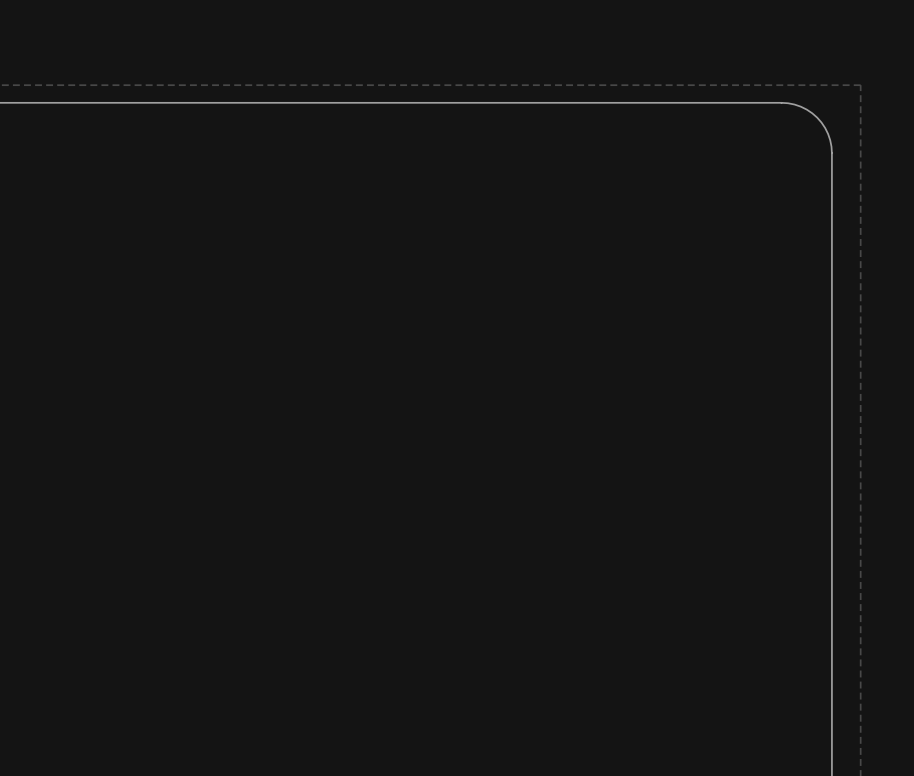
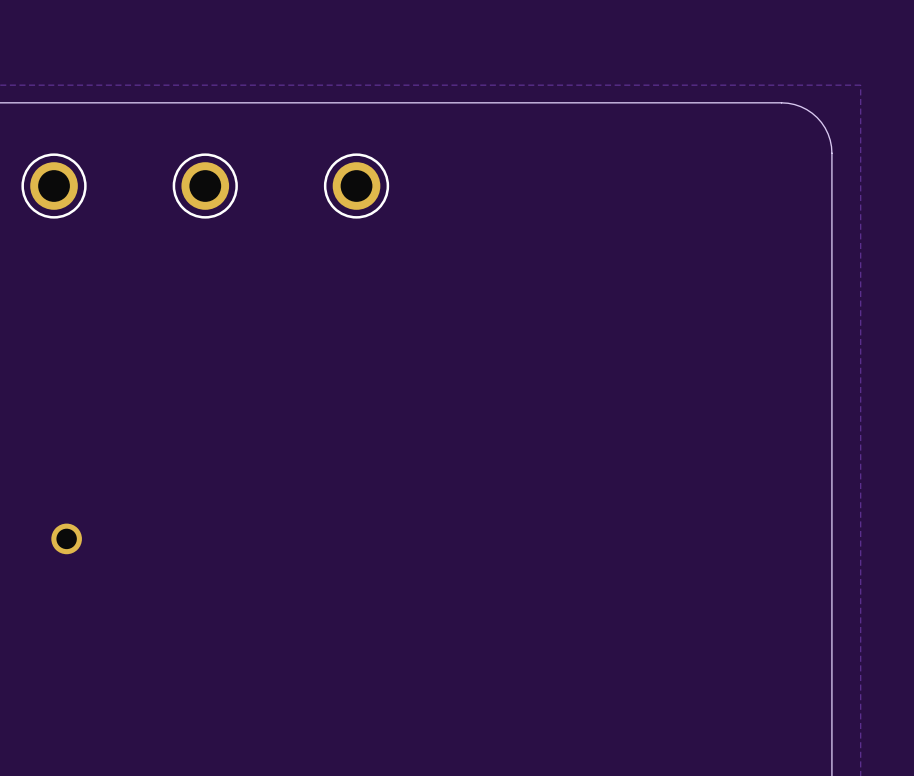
part: none -> (54, 186)
part: none -> (205, 186)
part: none -> (356, 186)
part: none -> (66, 538)

